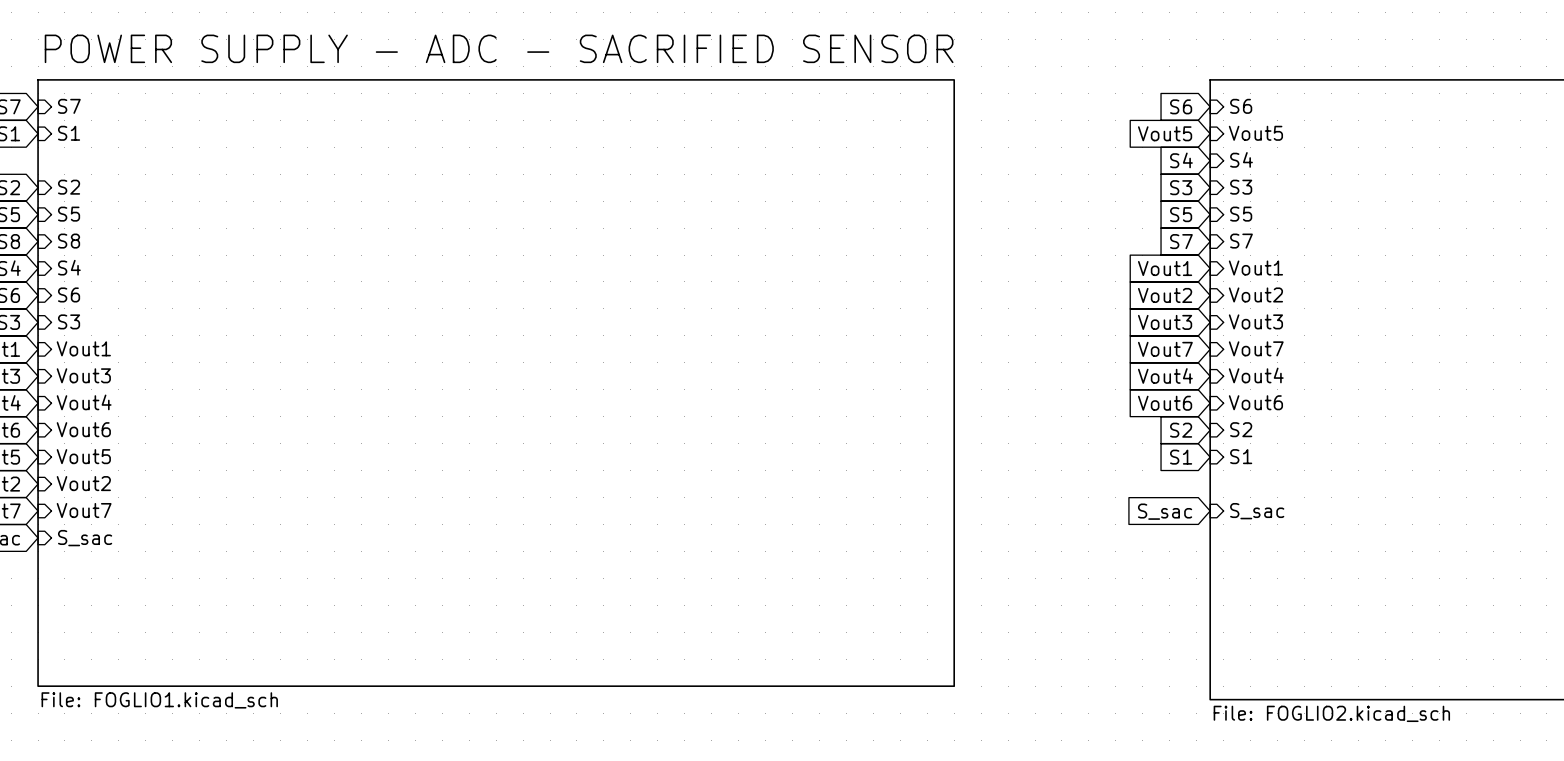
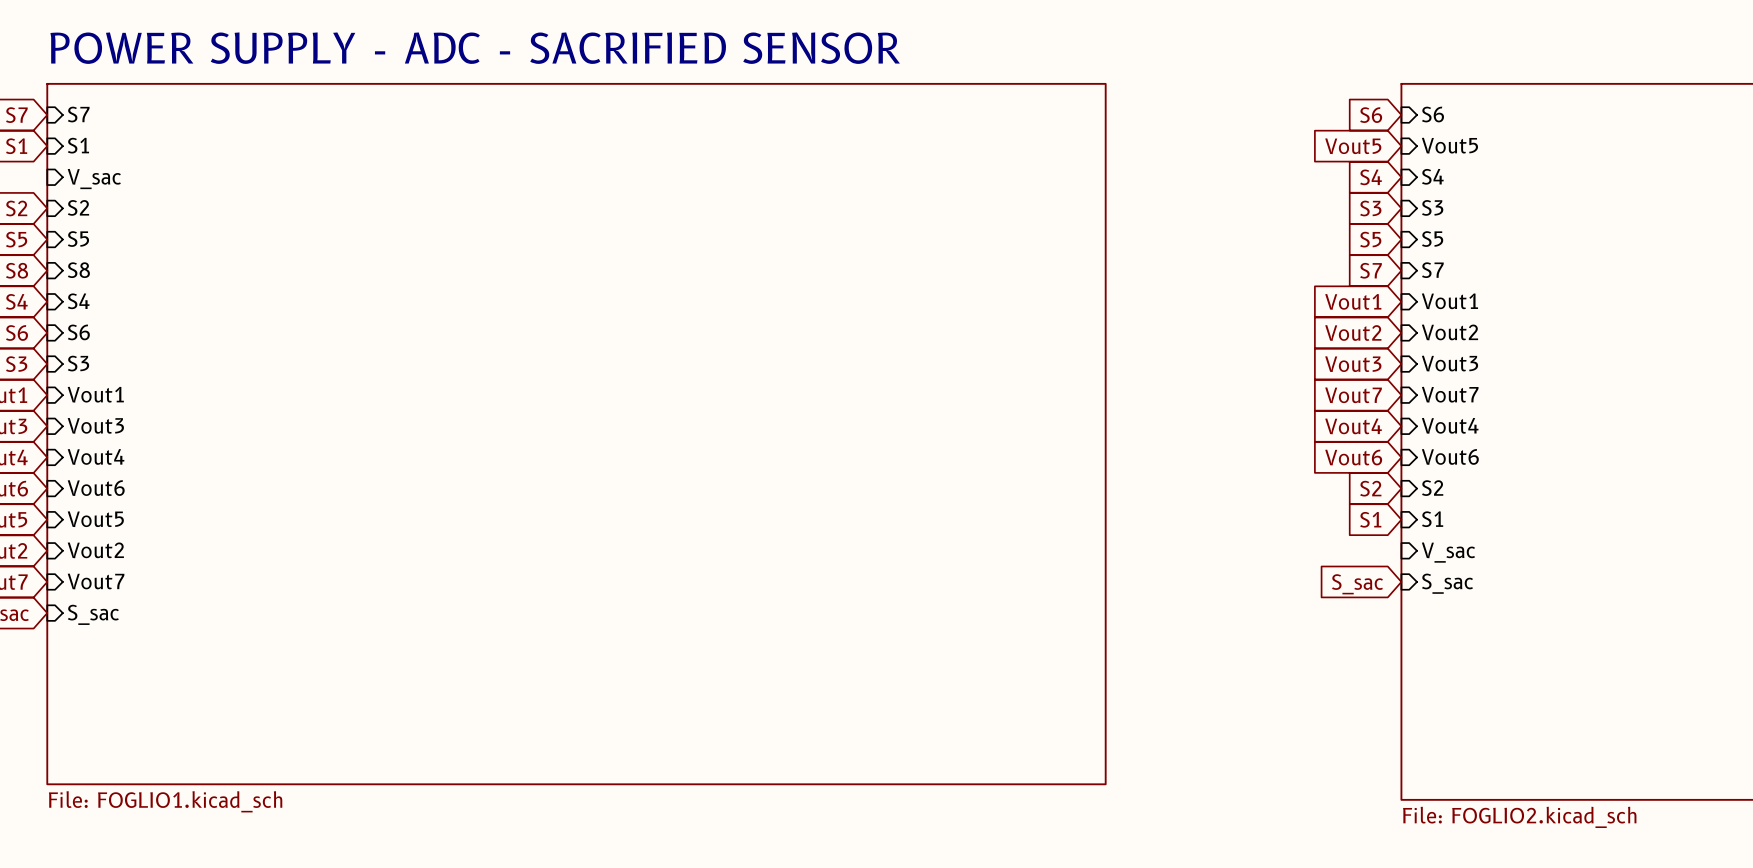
sheet pin: none -> V_sac (94, 179)
sheet pin: none -> V_sac (1448, 552)

